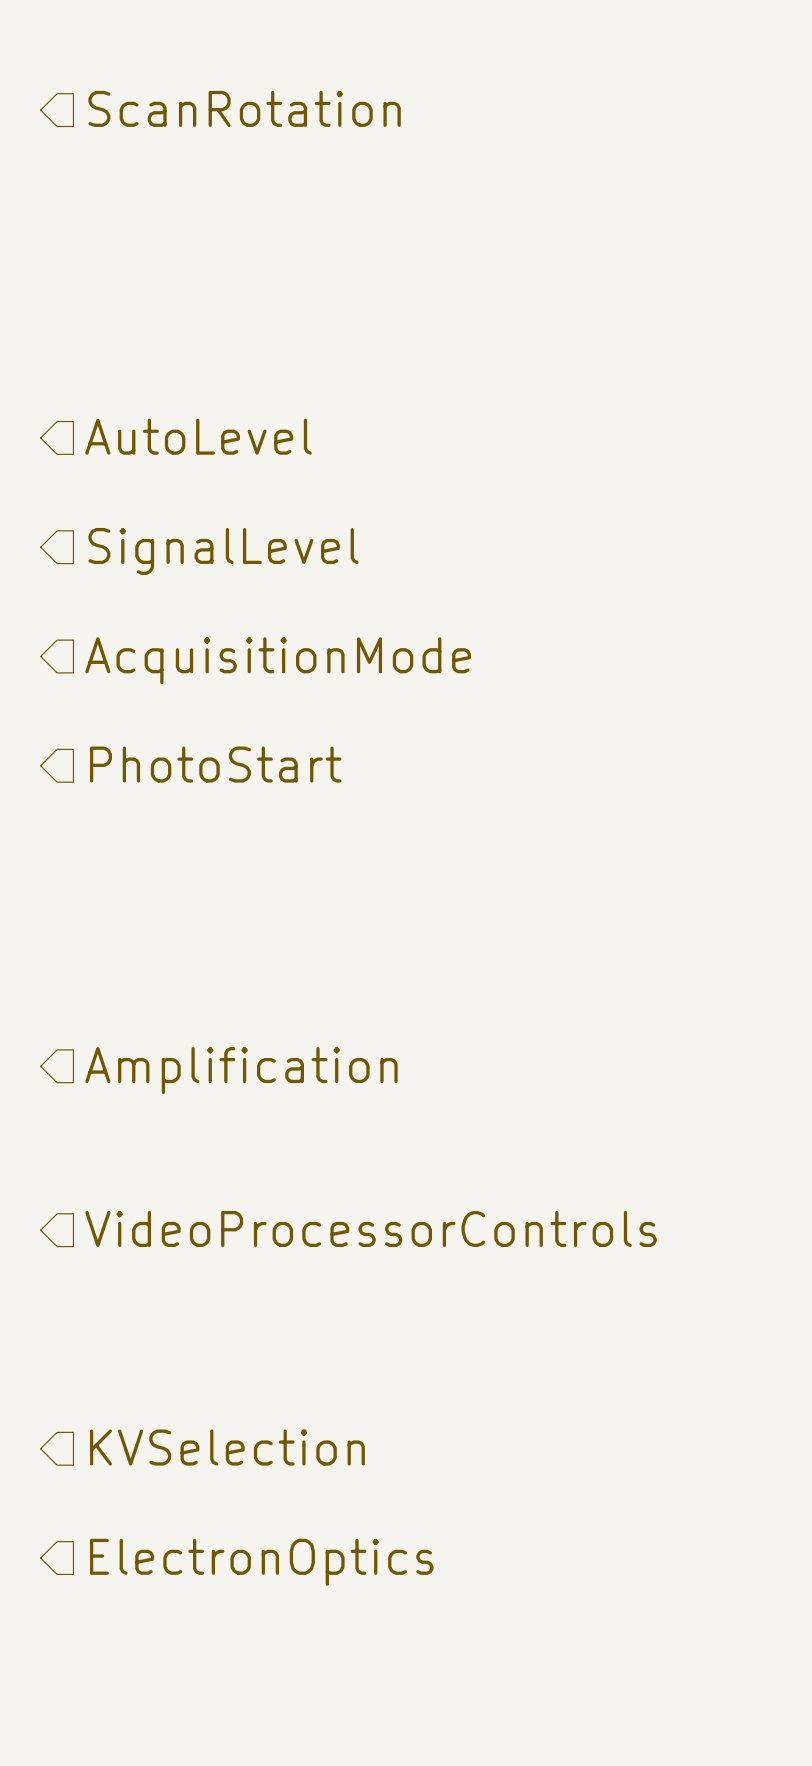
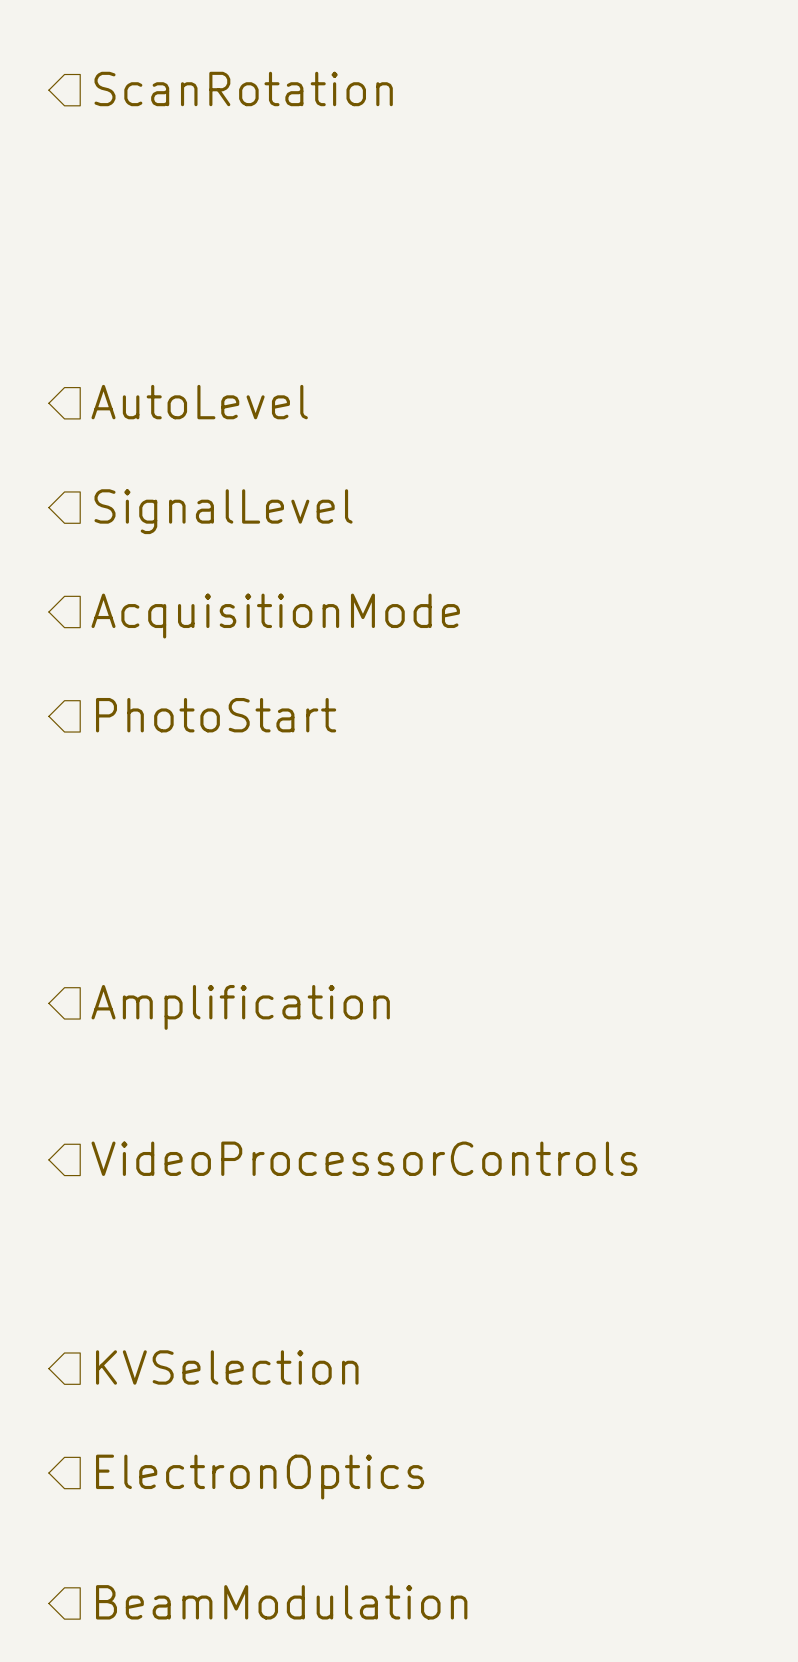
hierarchical label: none -> BeamModulation (281, 1602)

